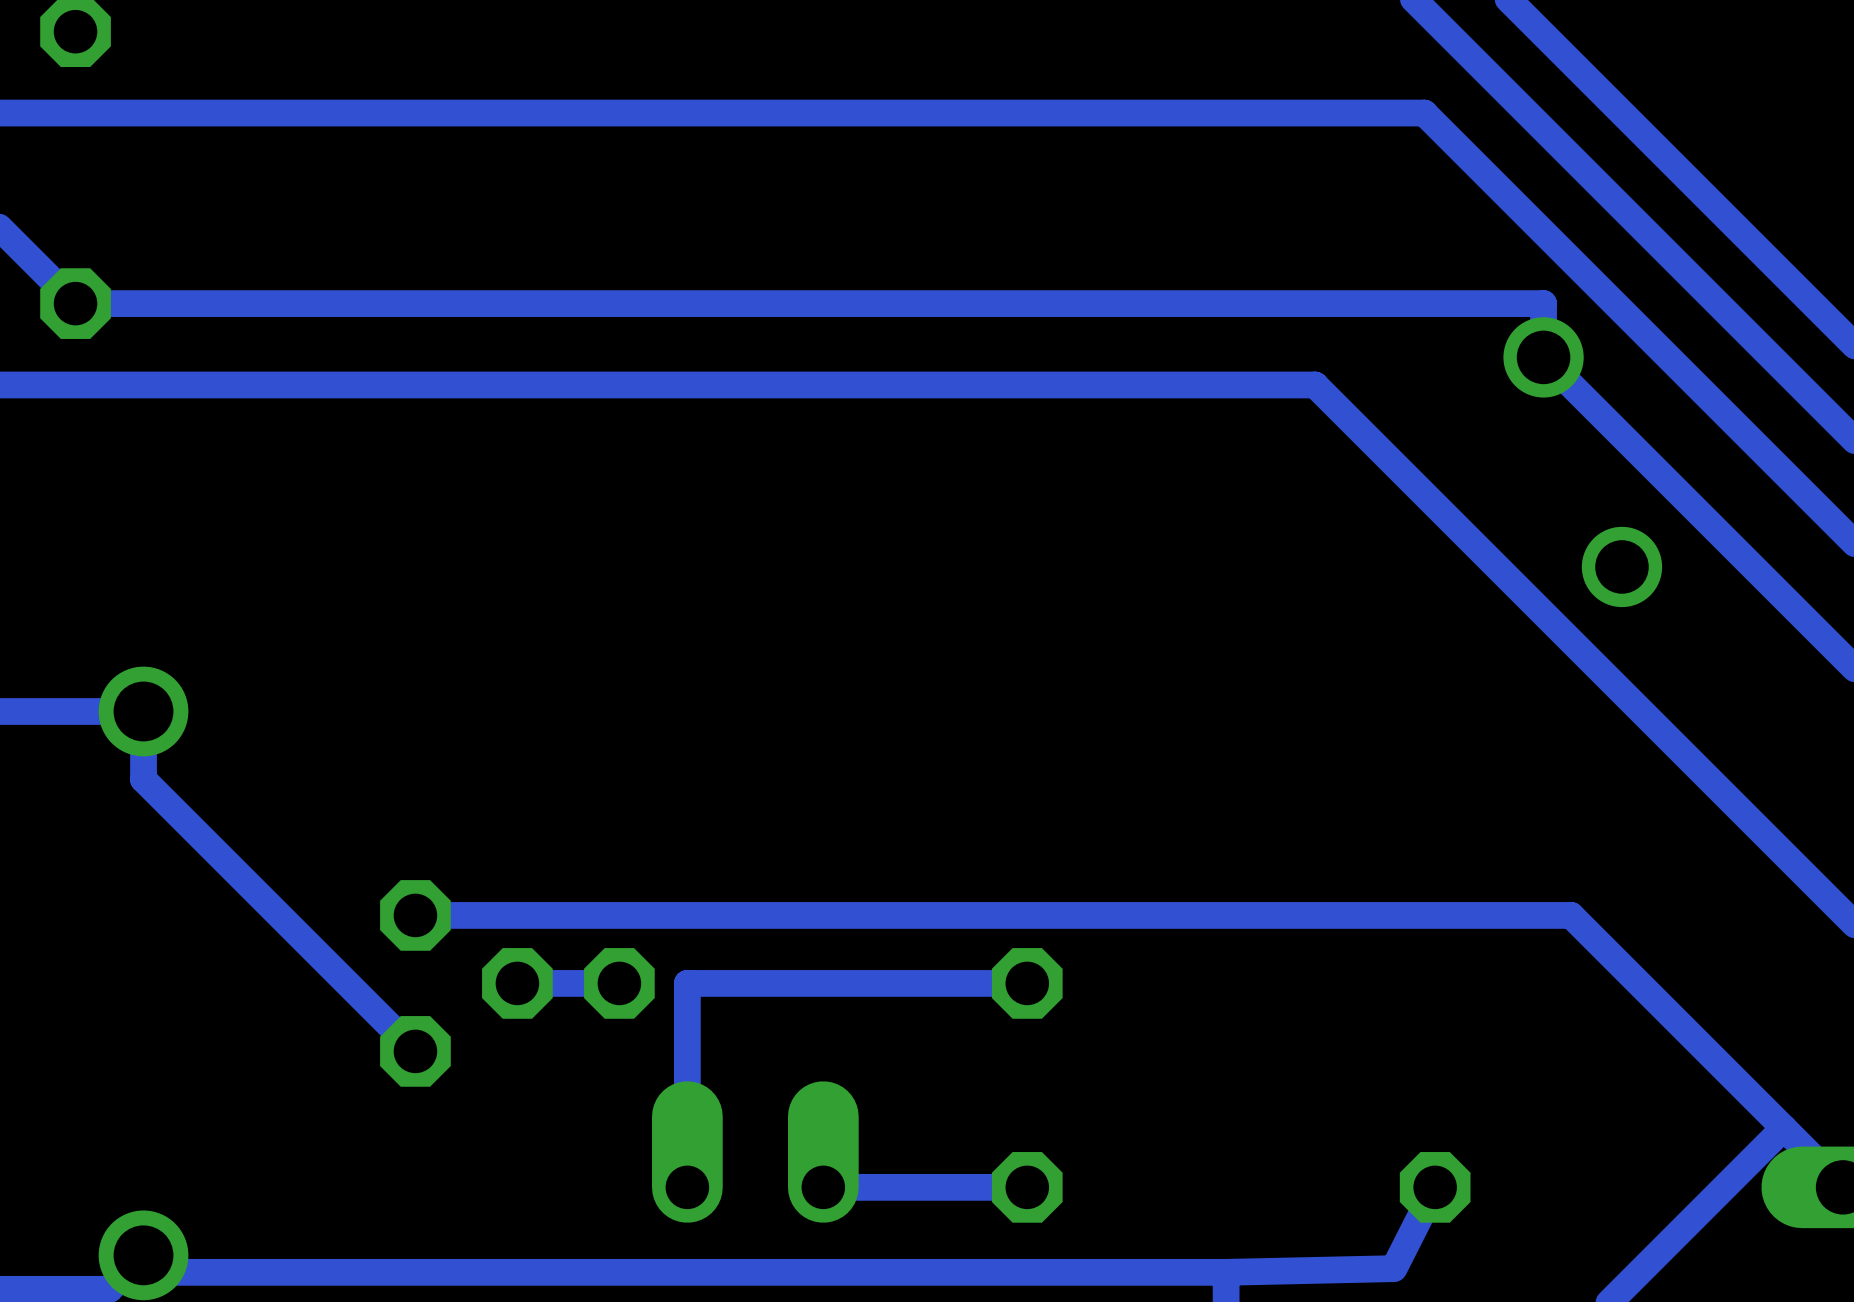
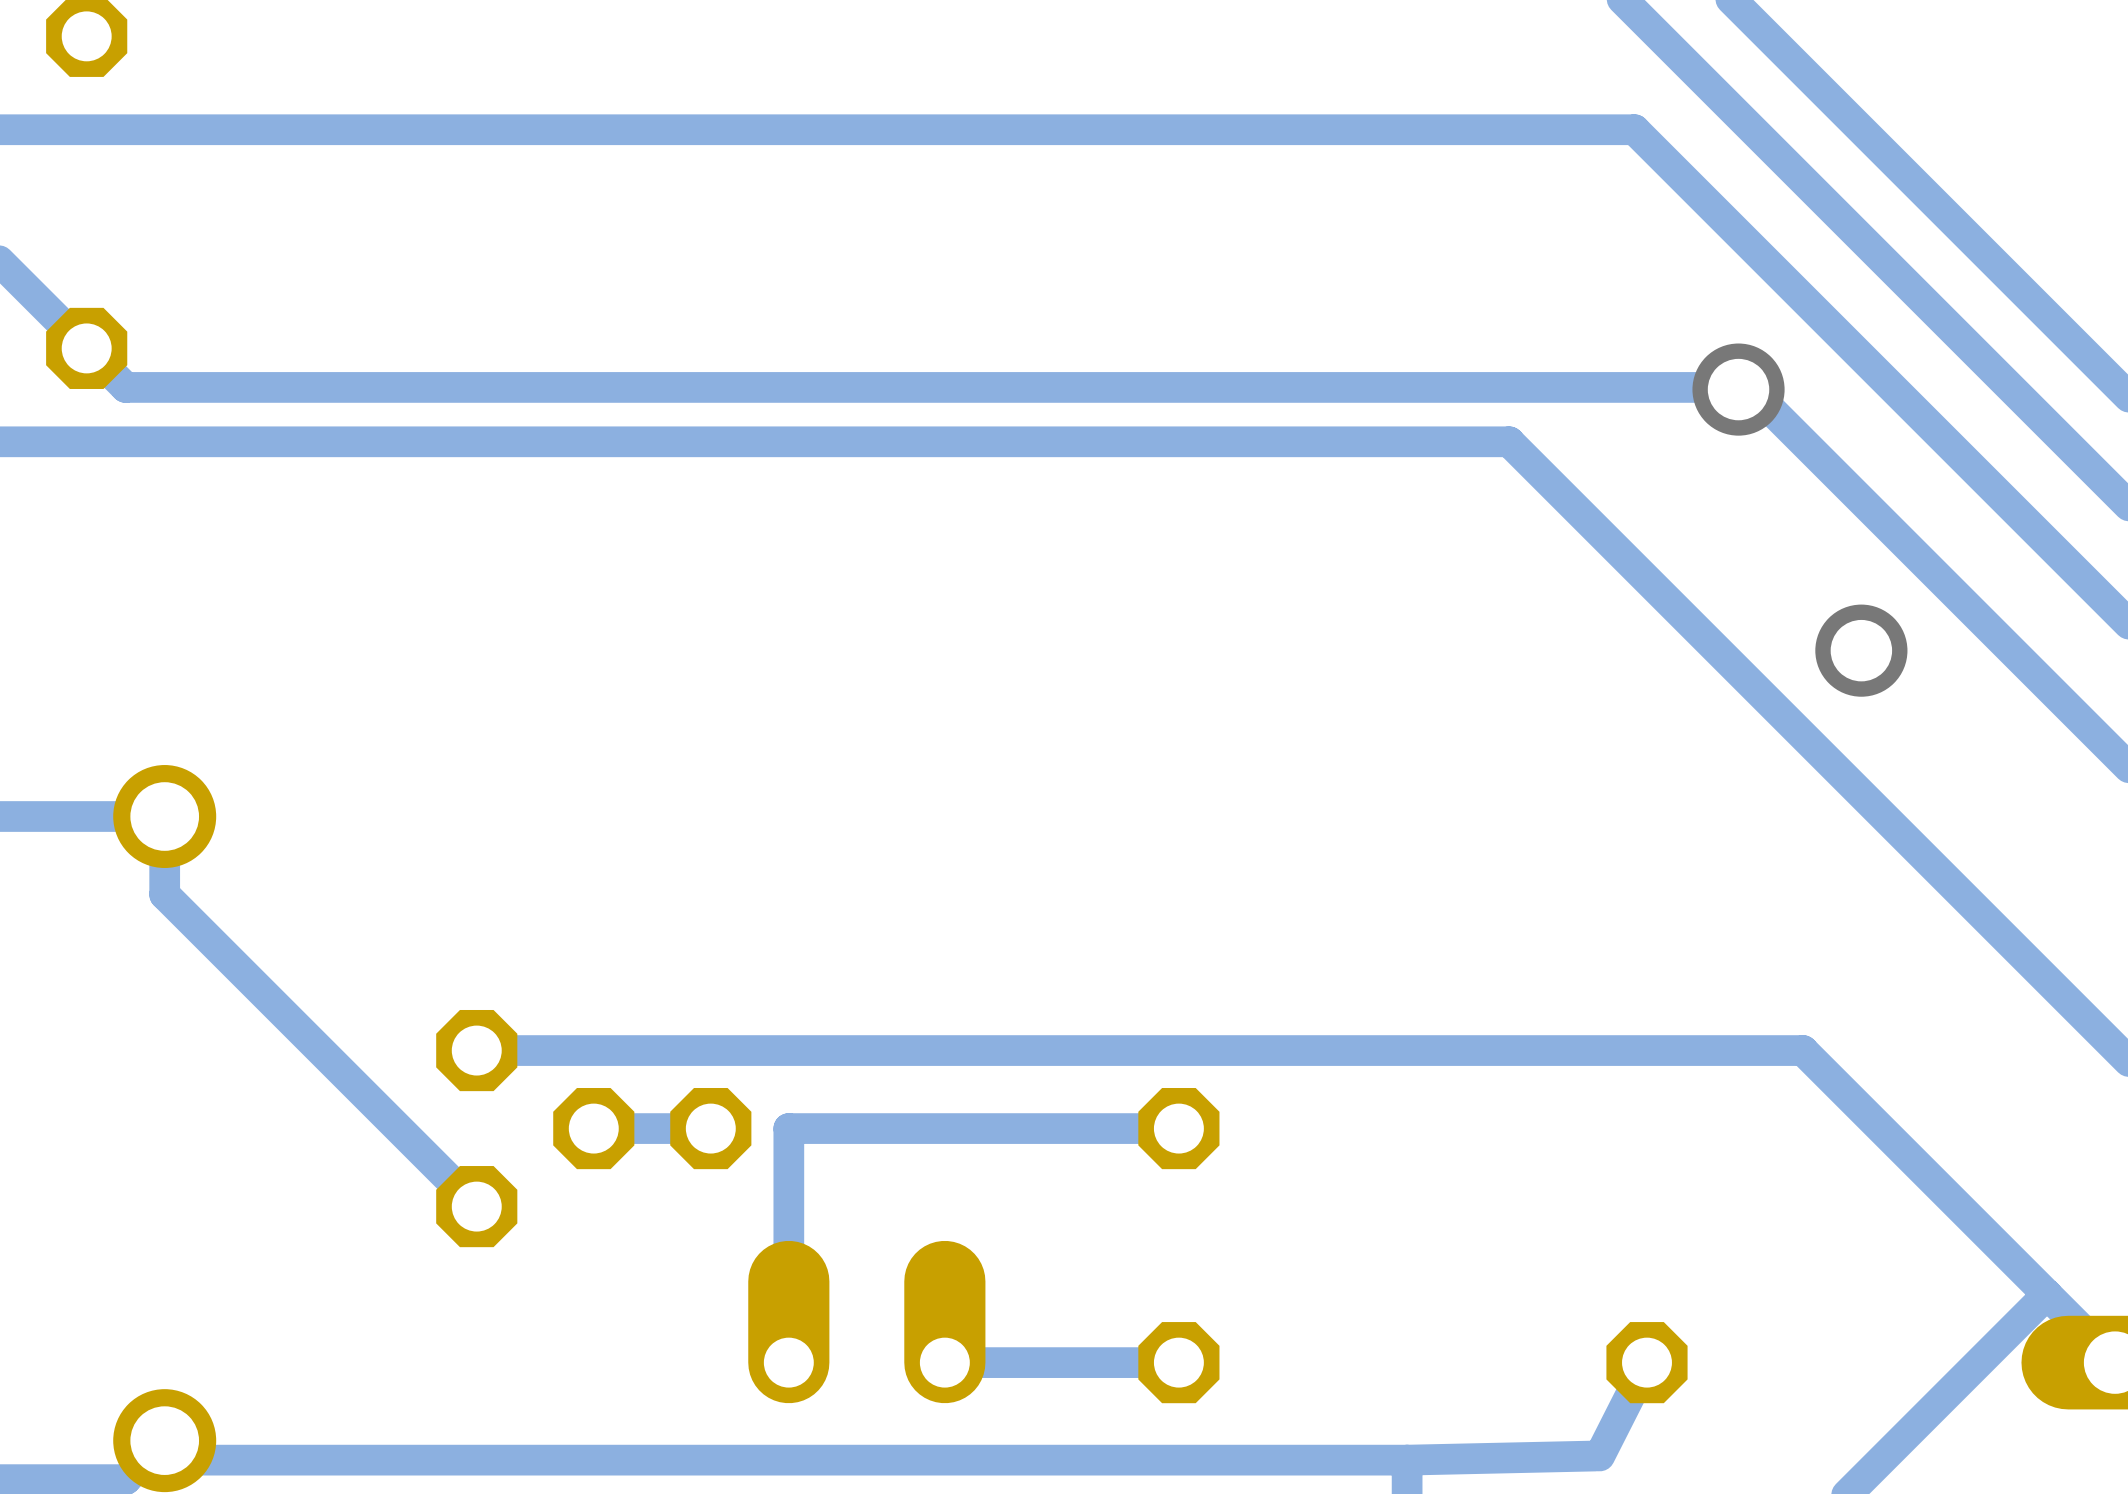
track: (75, 303) (1543, 303) (1543, 357) -> (86, 348) (125, 387) (1748, 387) (1771, 410)
via position: (1543, 357) -> (1738, 389)

